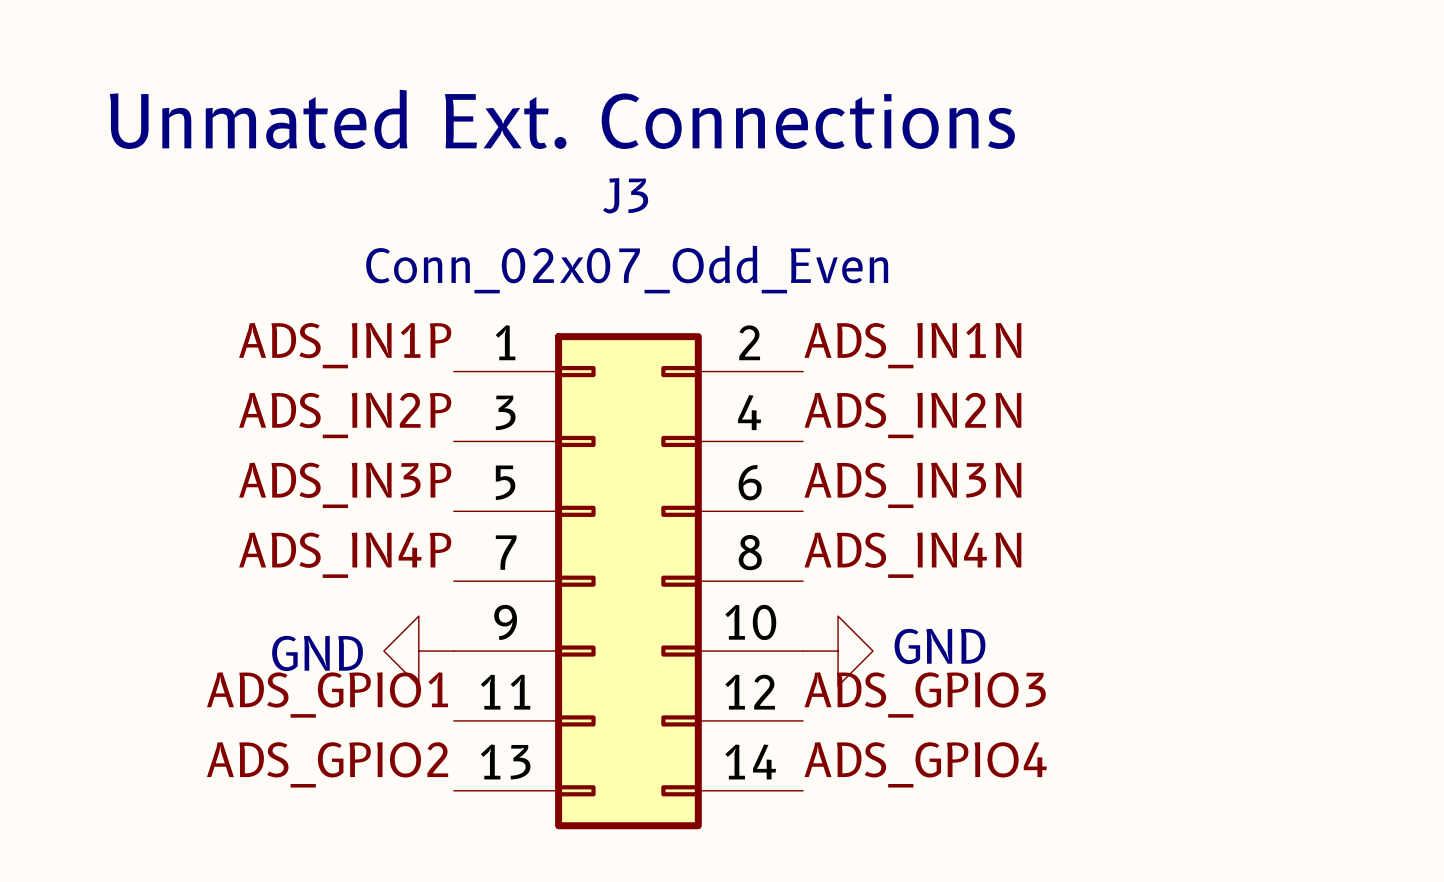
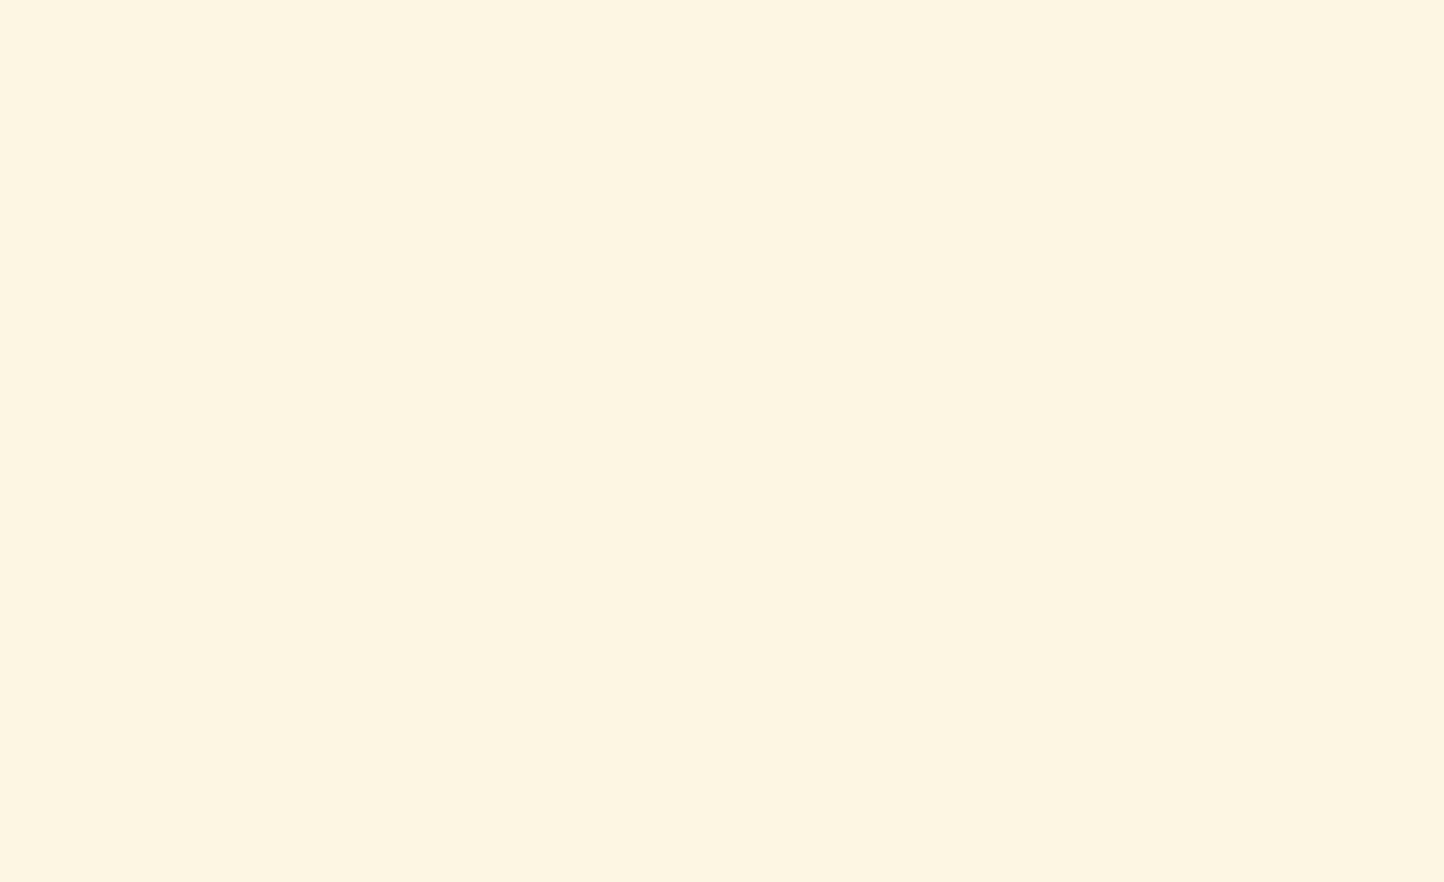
text: Unmated Ext. Connections (562, 119) -> none
label: ADS_IN1P (345, 345) -> none
label: ADS_IN1N (912, 345) -> none
label: ADS_IN2P (345, 415) -> none
label: ADS_IN2N (912, 415) -> none
label: ADS_IN3P (345, 485) -> none
label: ADS_IN3N (912, 485) -> none
label: ADS_IN4P (345, 555) -> none
label: ADS_IN4N (912, 555) -> none
J3: Conn_02x07_Odd_Even (628, 581) -> none
power symbol: GND (418, 651) -> none
power symbol: GND (838, 651) -> none
label: ADS_GPIO1 (327, 694) -> none
label: ADS_GPIO3 (925, 694) -> none
label: ADS_GPIO2 (327, 764) -> none
label: ADS_GPIO4 (925, 764) -> none

